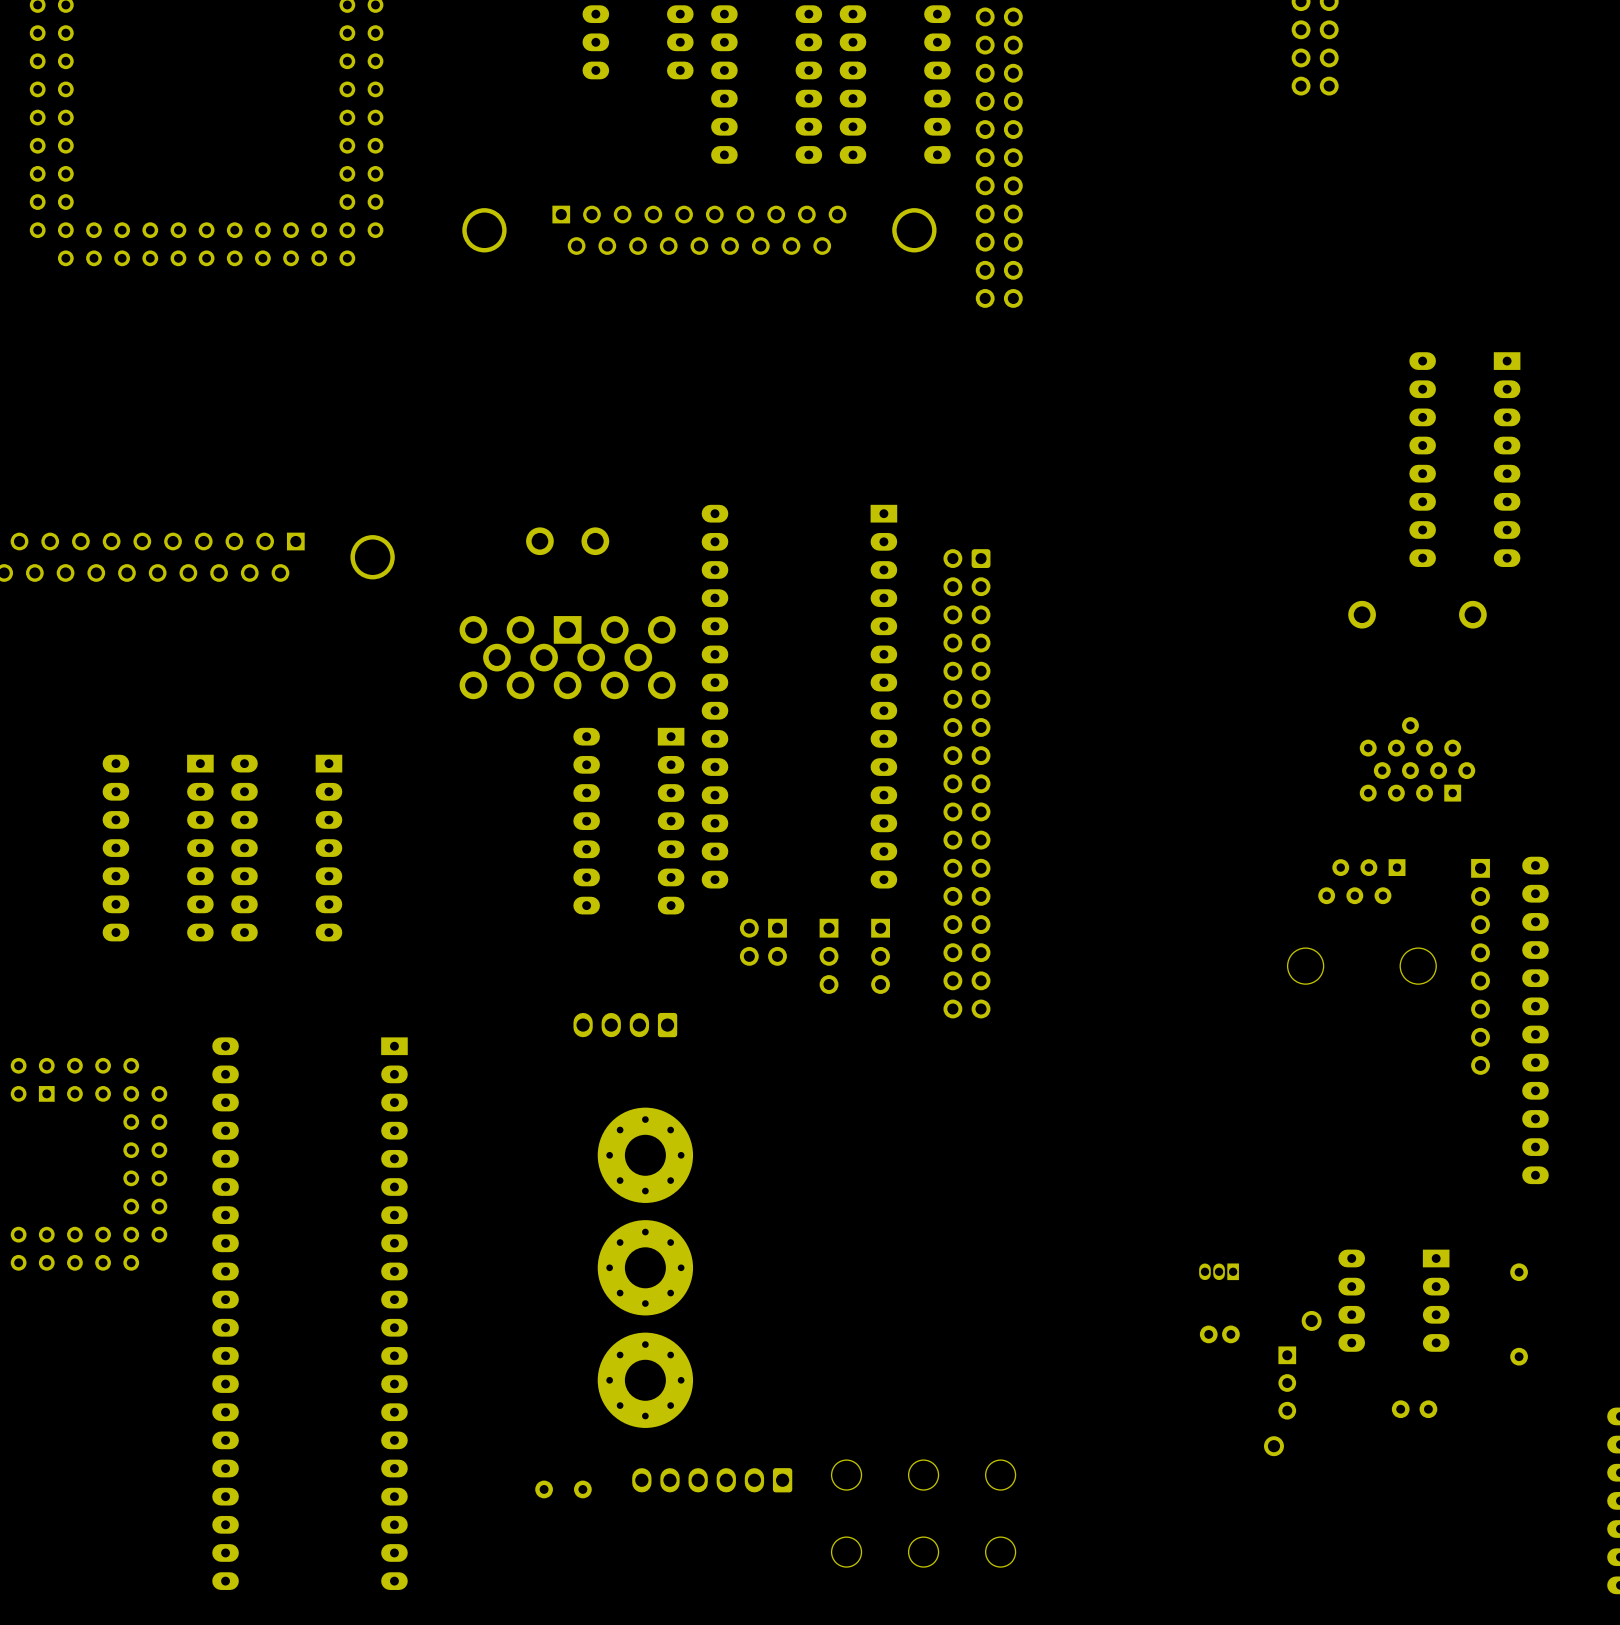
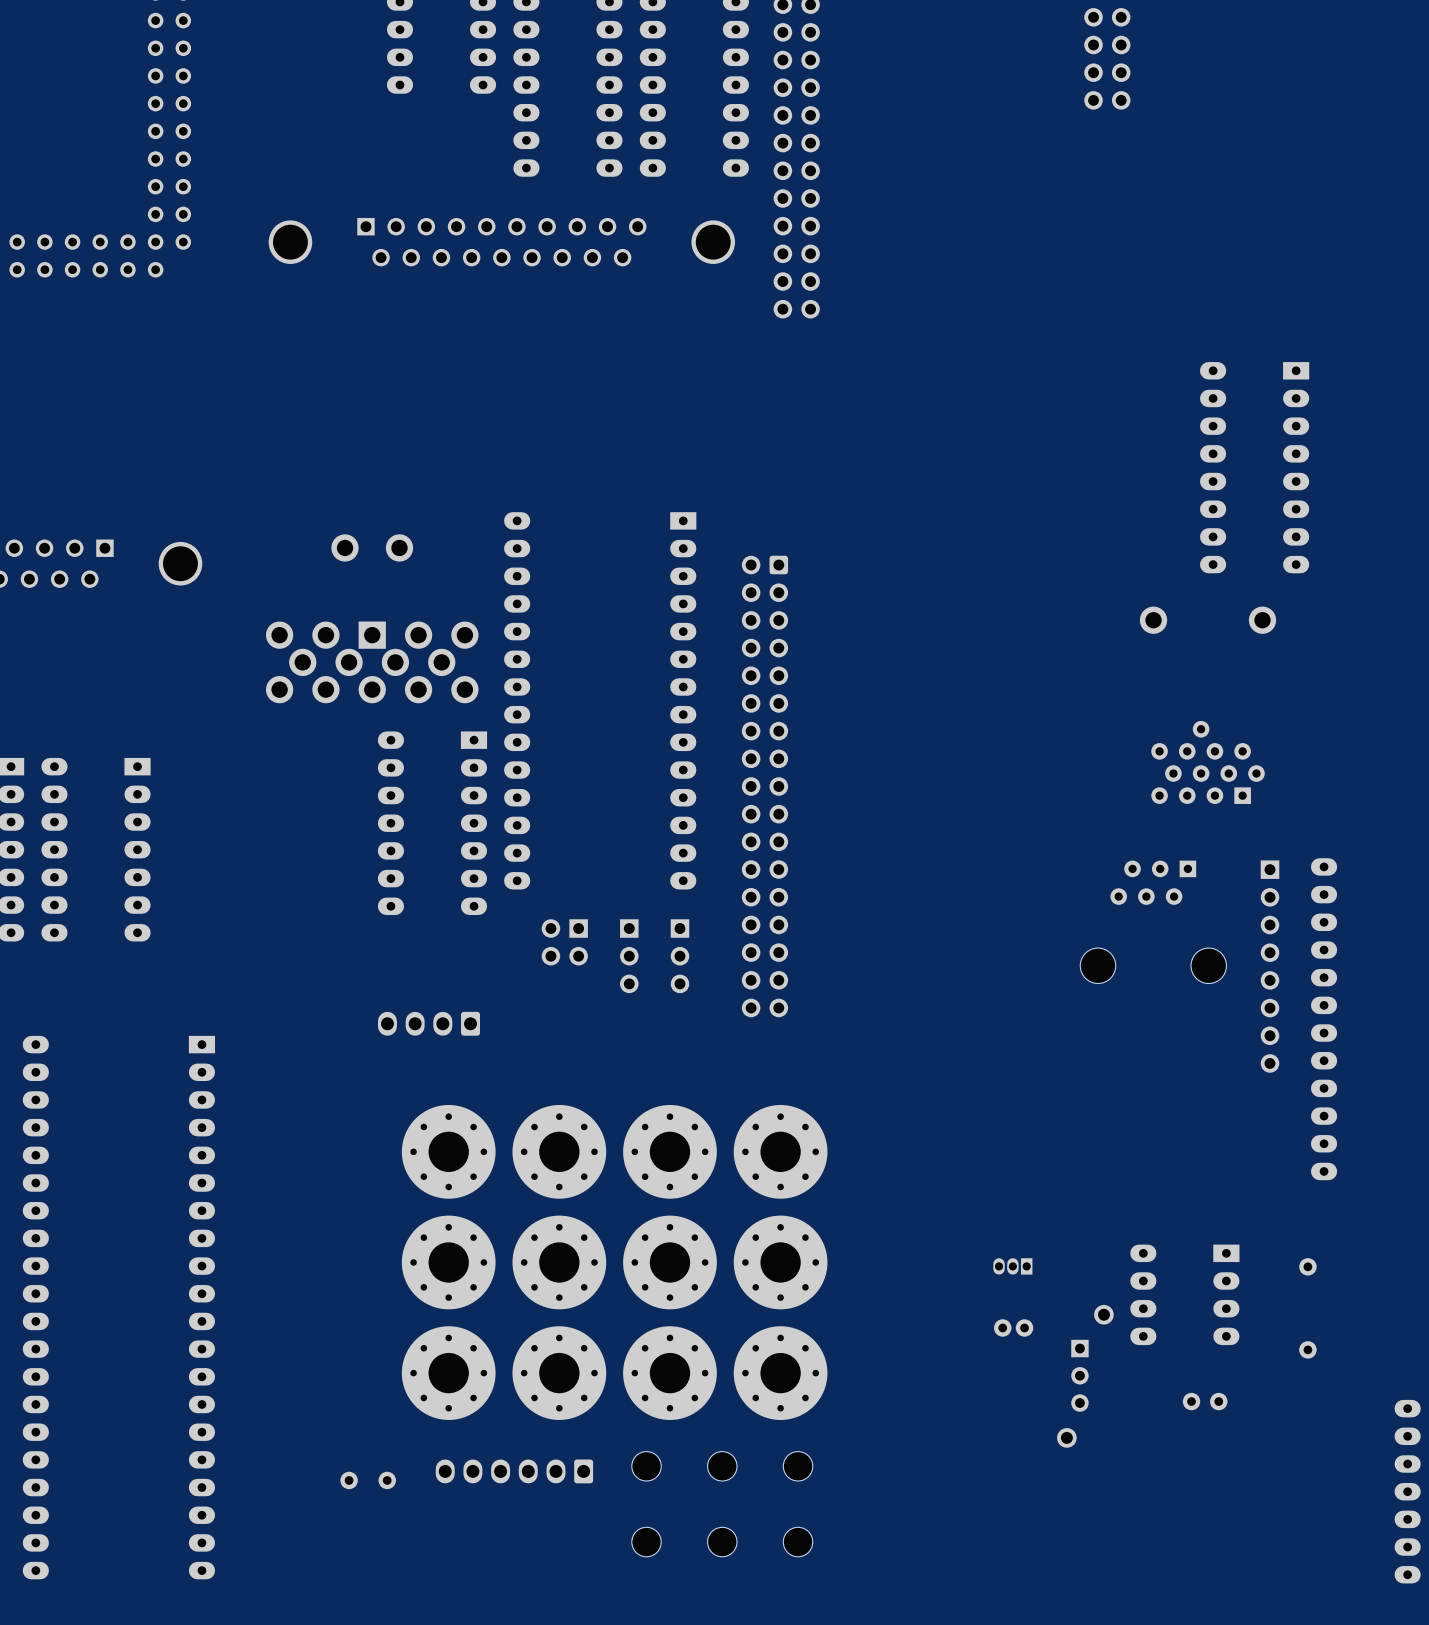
part: none -> (559, 1151)
part: none -> (669, 1151)
part: none -> (780, 1151)
part: none -> (559, 1262)
part: none -> (669, 1262)
part: none -> (780, 1262)
part: none -> (559, 1373)
part: none -> (669, 1373)
part: none -> (780, 1373)

